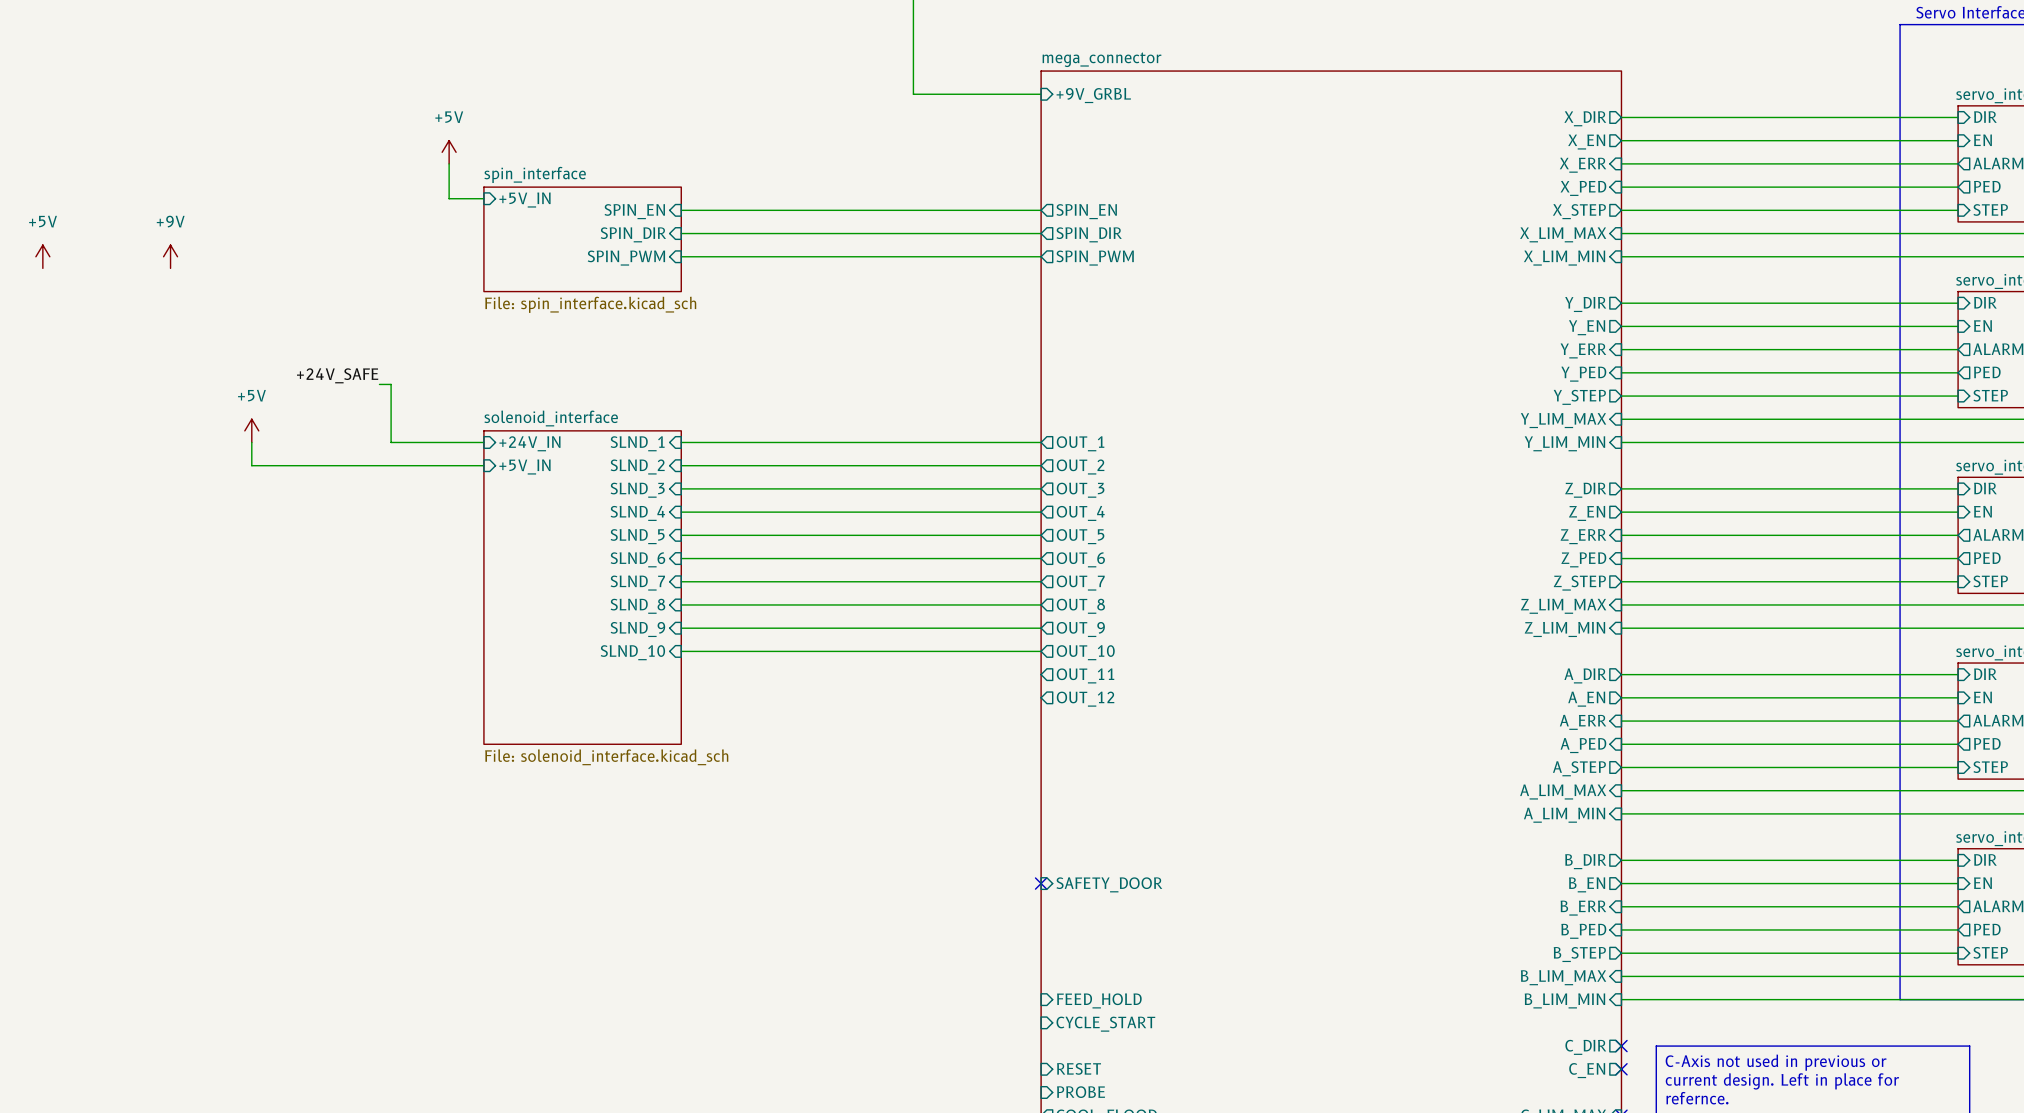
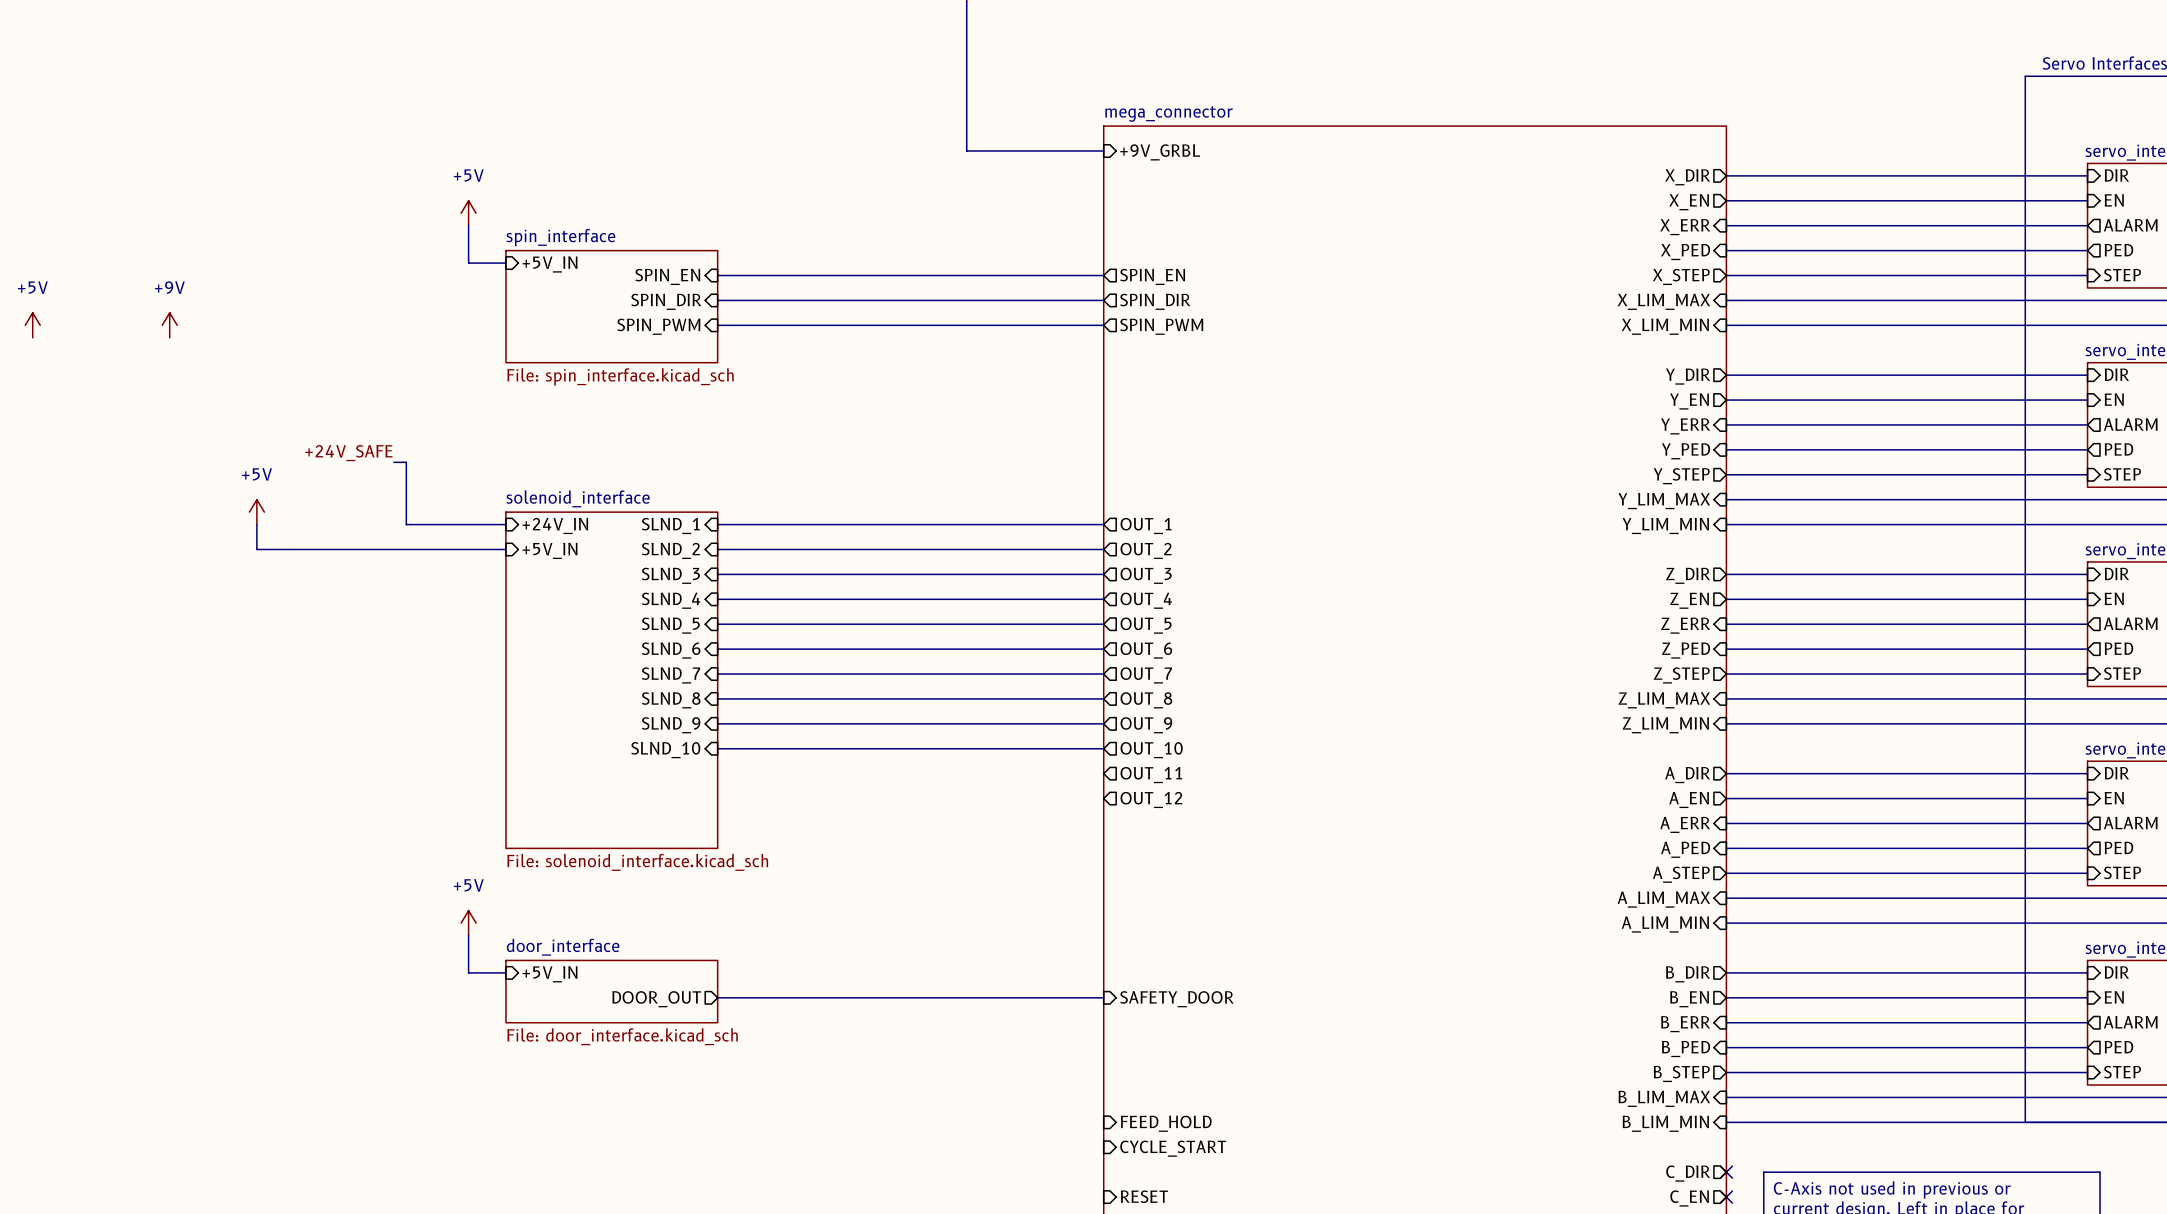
power symbol: none -> +5V (468, 923)
wire: none -> (468, 935) (468, 972) (505, 972)
sheet pin: none -> +5V_IN (550, 974)
sheet door_interface: none -> File: door_interface.kicad_sch (611, 991)
wire: none -> (717, 997) (1103, 997)
no-connect mark: (1041, 883) -> none
sheet pin: none -> DOOR_OUT (656, 999)

